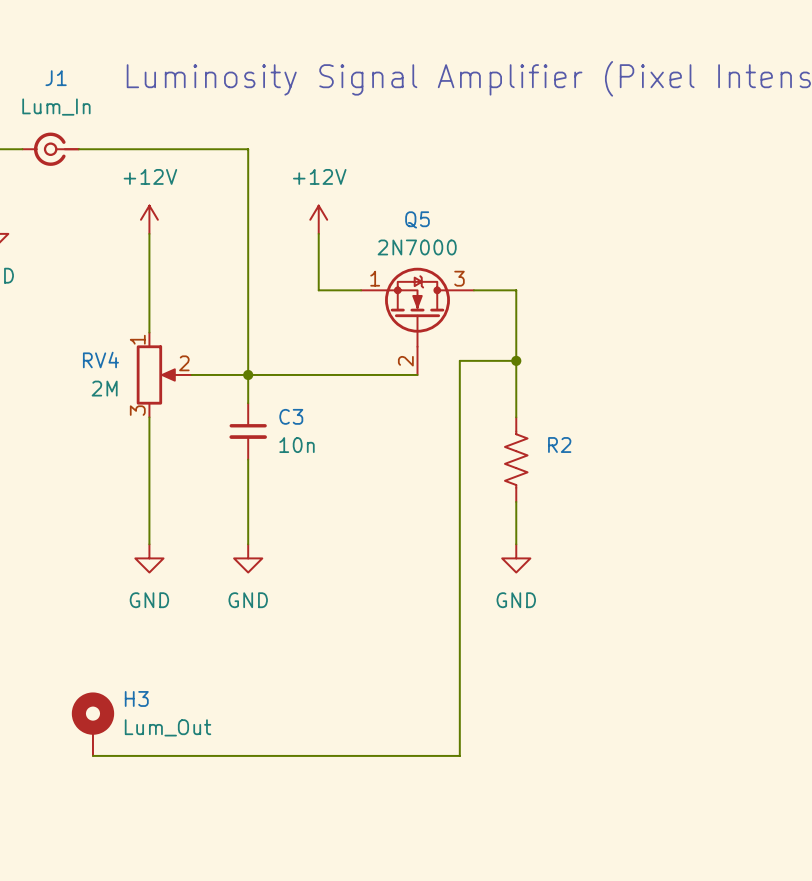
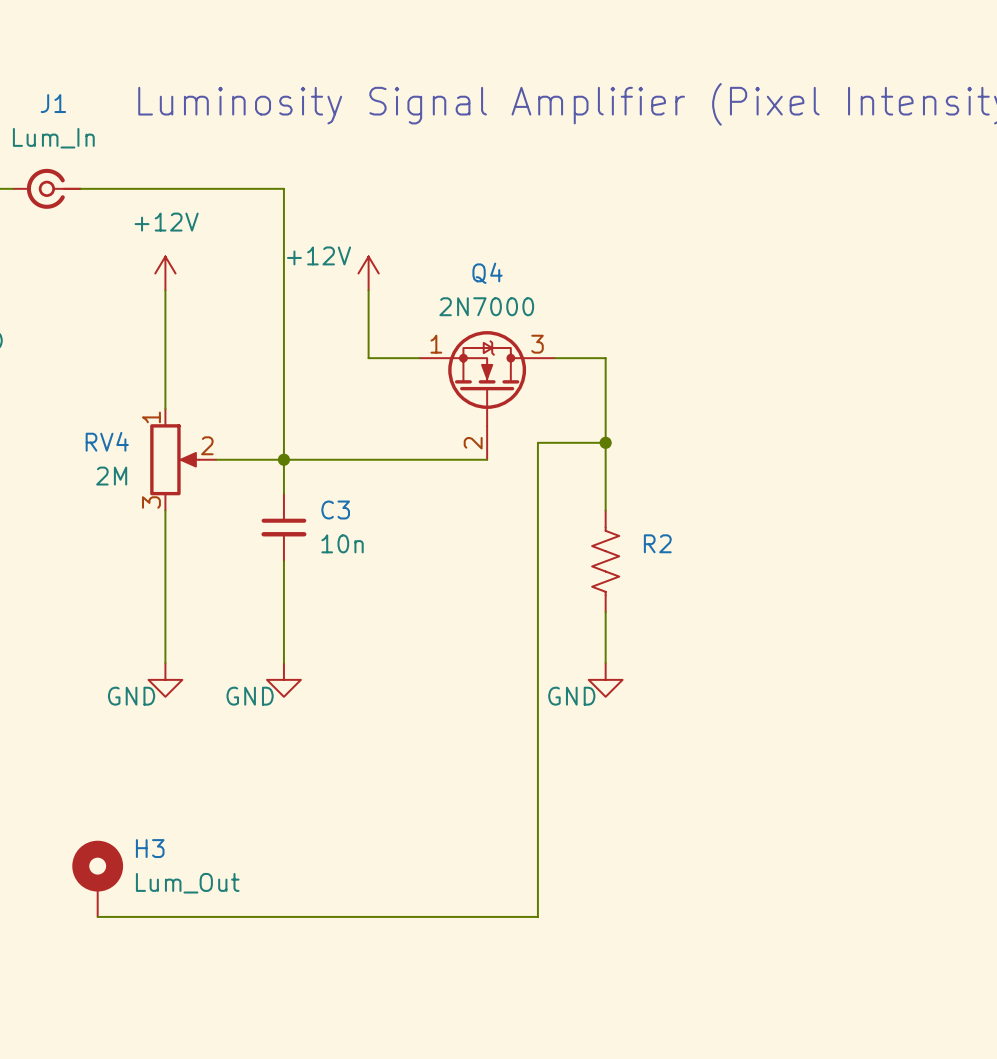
power symbol text position: +12V (319, 176) -> +12V (319, 255)
Q5 name: Q5 (417, 219) -> Q4 (487, 273)
power symbol text position: GND (149, 600) -> GND (131, 696)
power symbol text position: GND (248, 600) -> GND (250, 696)
power symbol text position: GND (516, 600) -> GND (571, 696)

